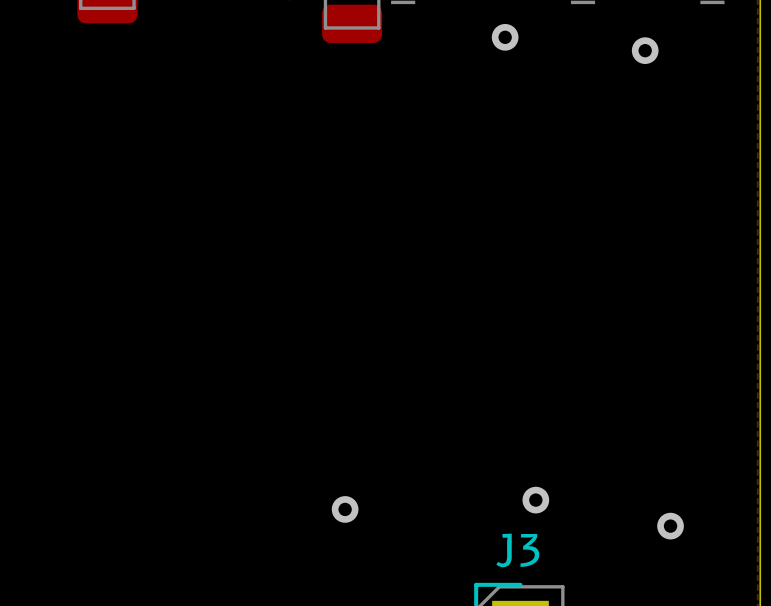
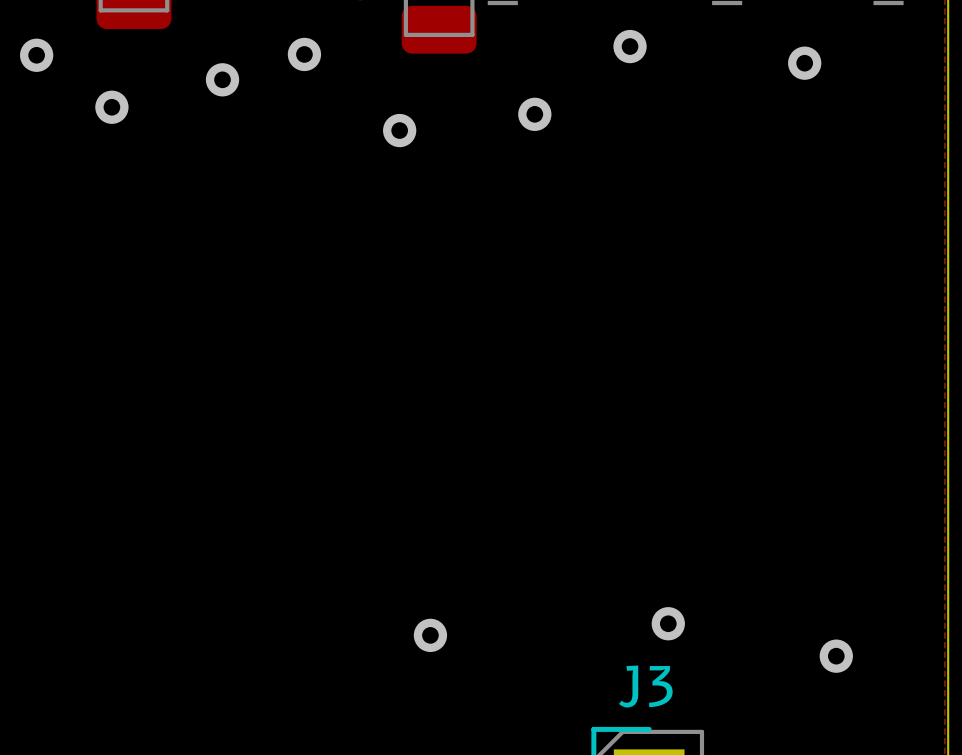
via: none -> (304, 54)
via: none -> (36, 55)
via: none -> (222, 79)
via: none -> (111, 107)
via: none -> (534, 114)
via: none -> (399, 130)

